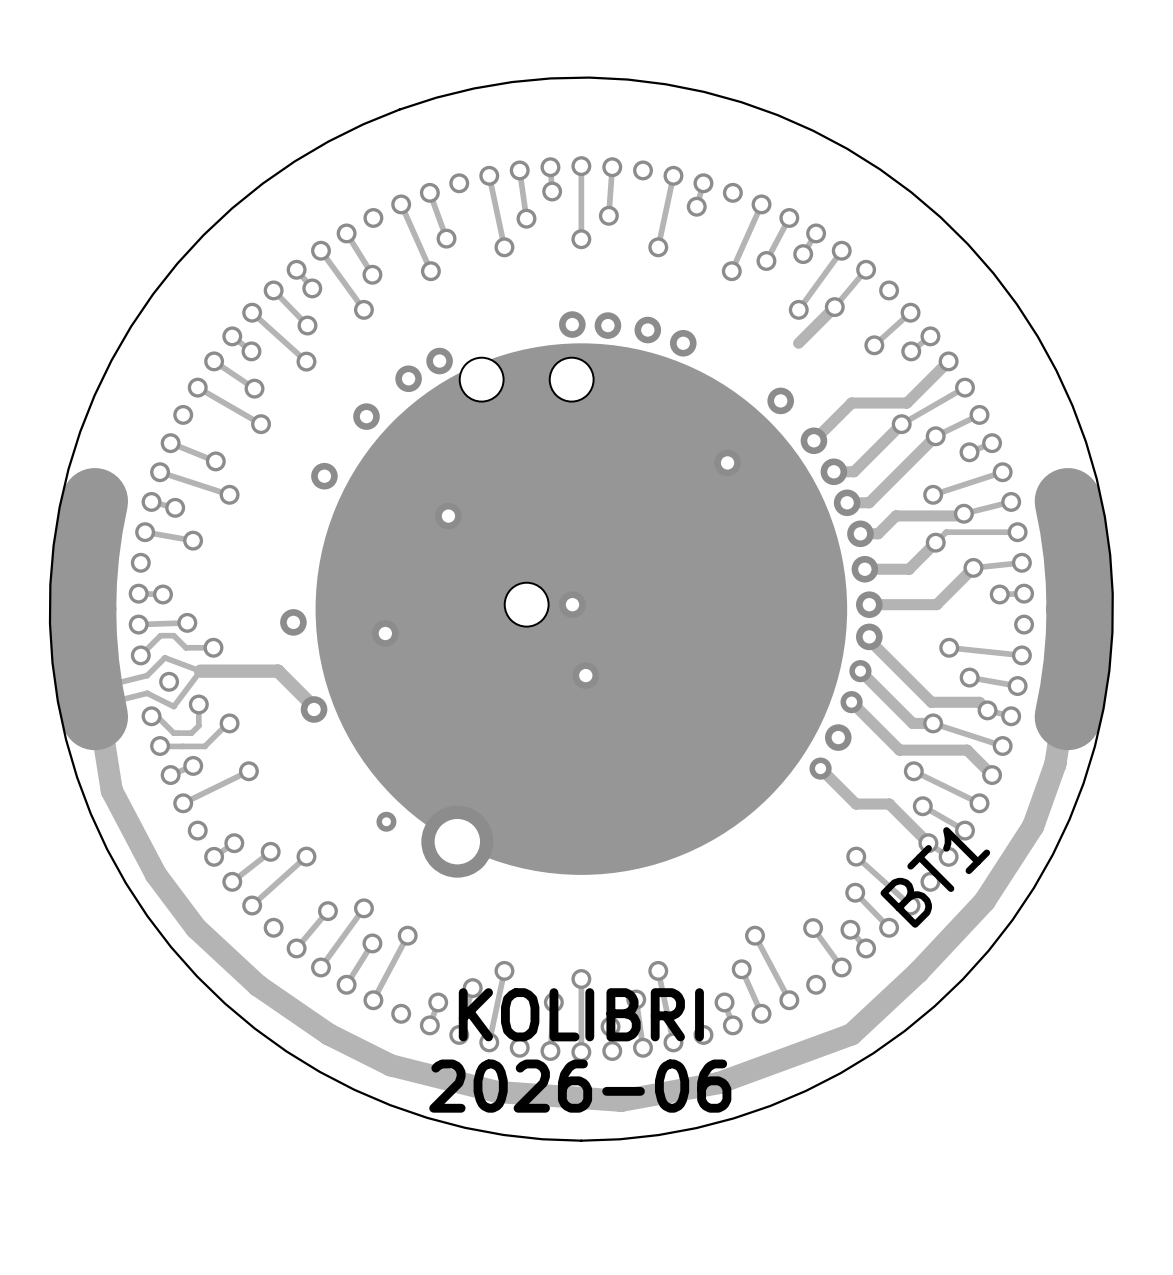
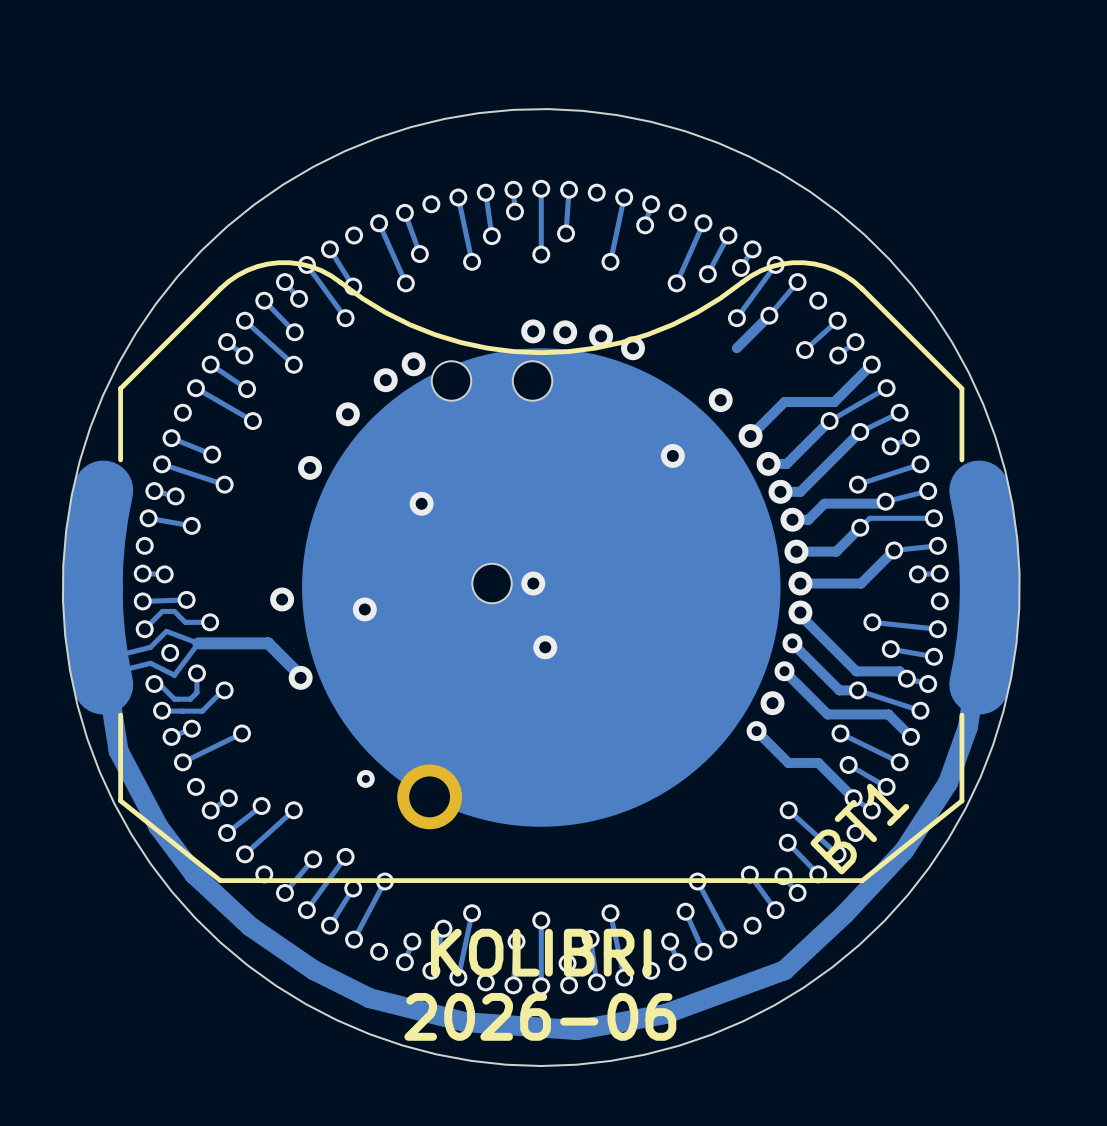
BT1 footprint: [49, 343, 1113, 875] -> [62, 260, 1020, 883]

